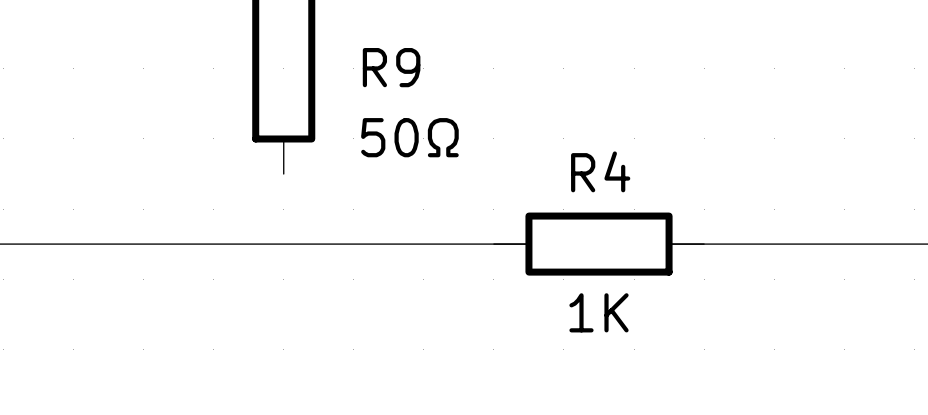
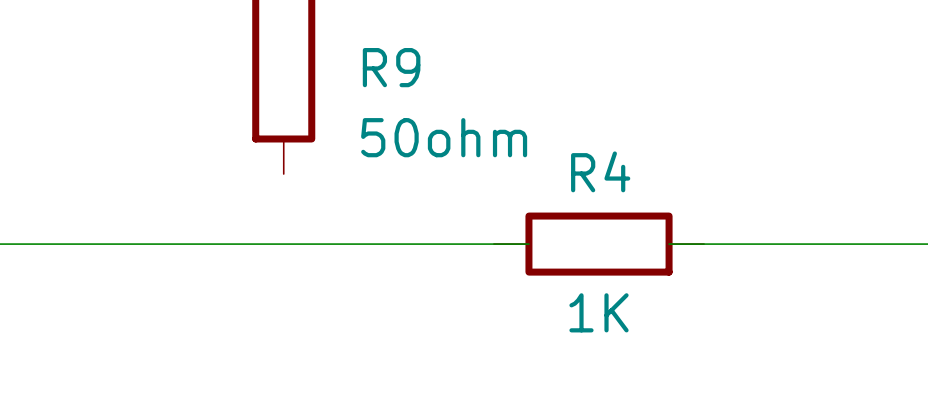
R9 value: 50Ω (409, 137) -> 50ohm (444, 137)

